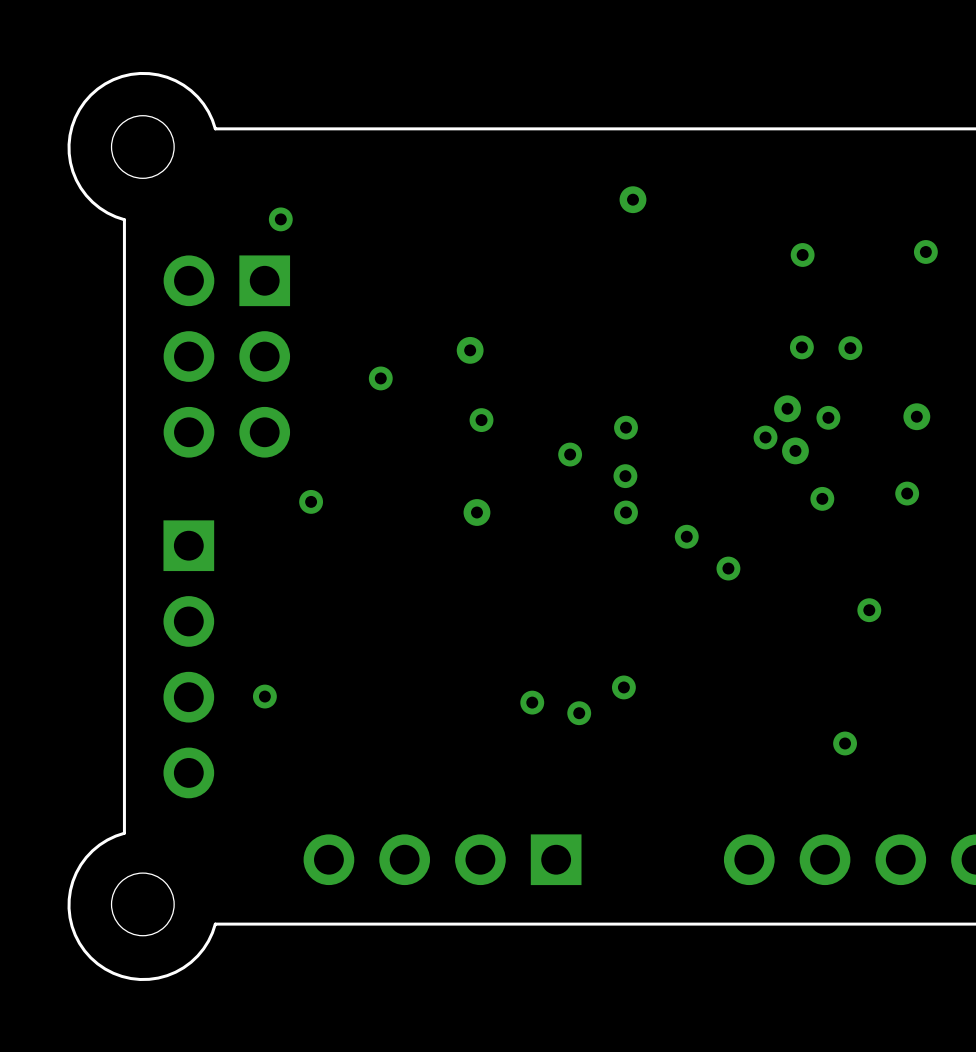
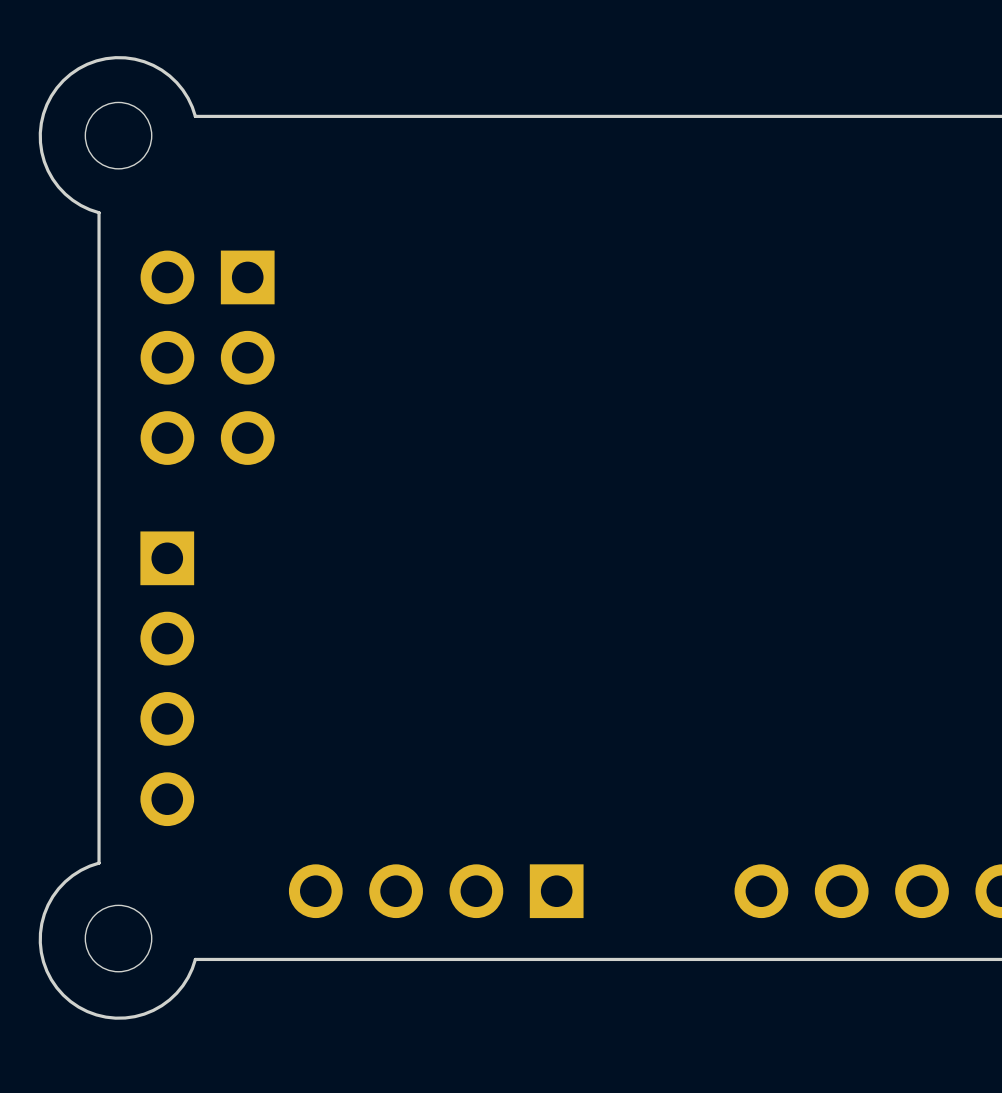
via: (632, 199) -> none
via: (280, 219) -> none
via: (925, 251) -> none
via: (802, 254) -> none
via: (801, 347) -> none
via: (850, 348) -> none
via: (470, 350) -> none
via: (380, 378) -> none
via: (787, 408) -> none
via: (916, 416) -> none
via: (828, 417) -> none
via: (481, 420) -> none
via: (625, 427) -> none
via: (765, 437) -> none
via: (795, 450) -> none
via: (570, 454) -> none
via: (625, 476) -> none
via: (907, 493) -> none
via: (822, 498) -> none
via: (311, 501) -> none
via: (476, 512) -> none
via: (625, 512) -> none
via: (686, 536) -> none
via: (728, 568) -> none
via: (869, 610) -> none
via: (623, 687) -> none
via: (264, 696) -> none
via: (532, 702) -> none
via: (579, 713) -> none
via: (845, 743) -> none

